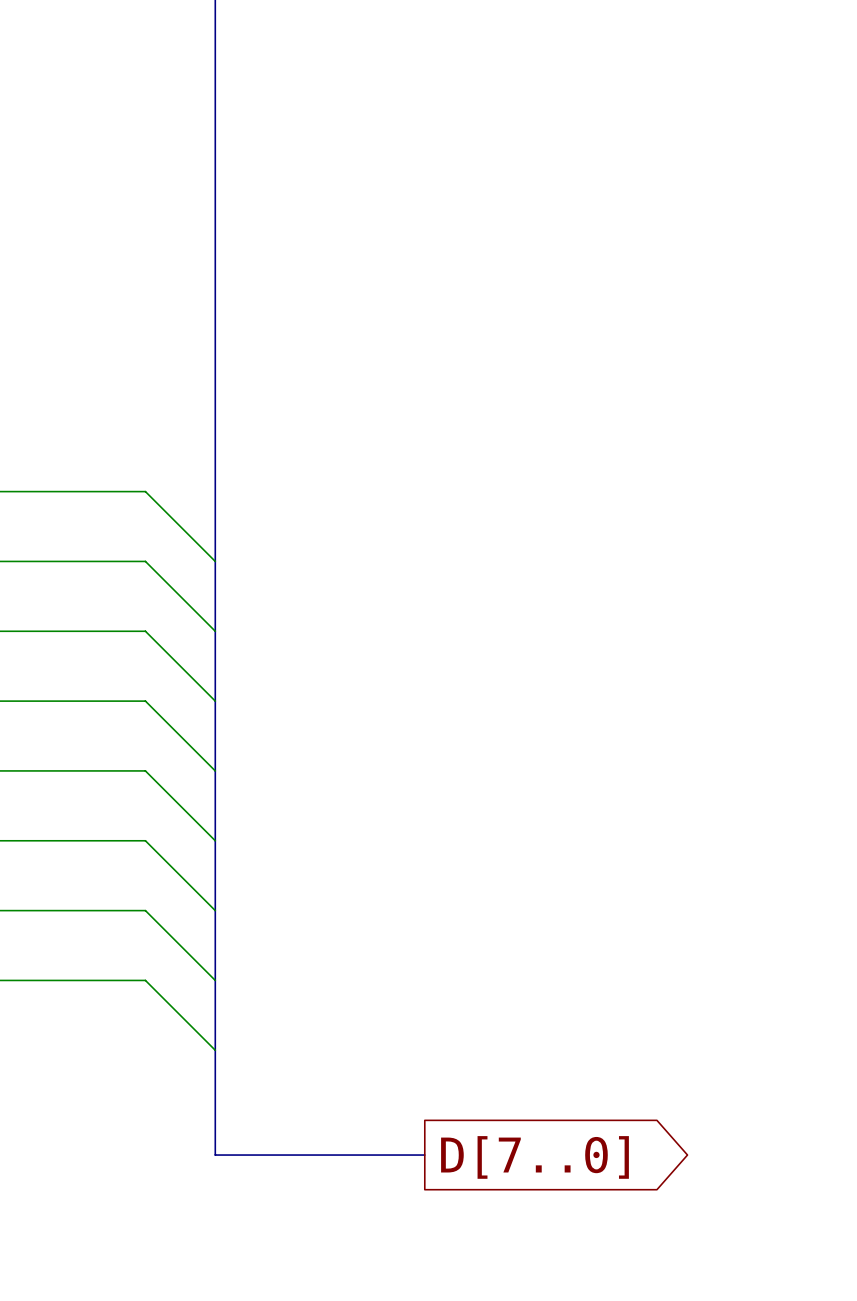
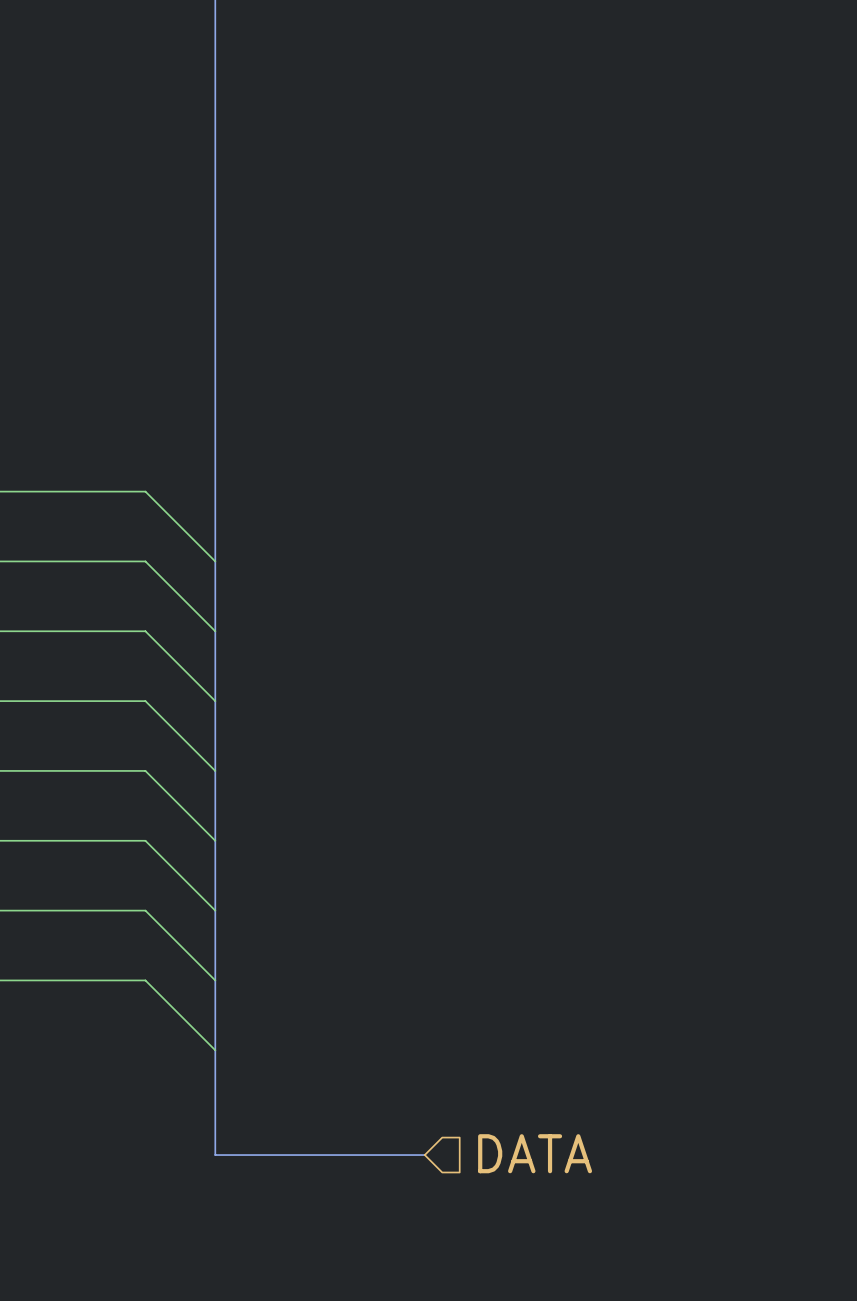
hierarchical label: none -> DATA (535, 1153)
global label: D[7..0] (534, 1157) -> none

